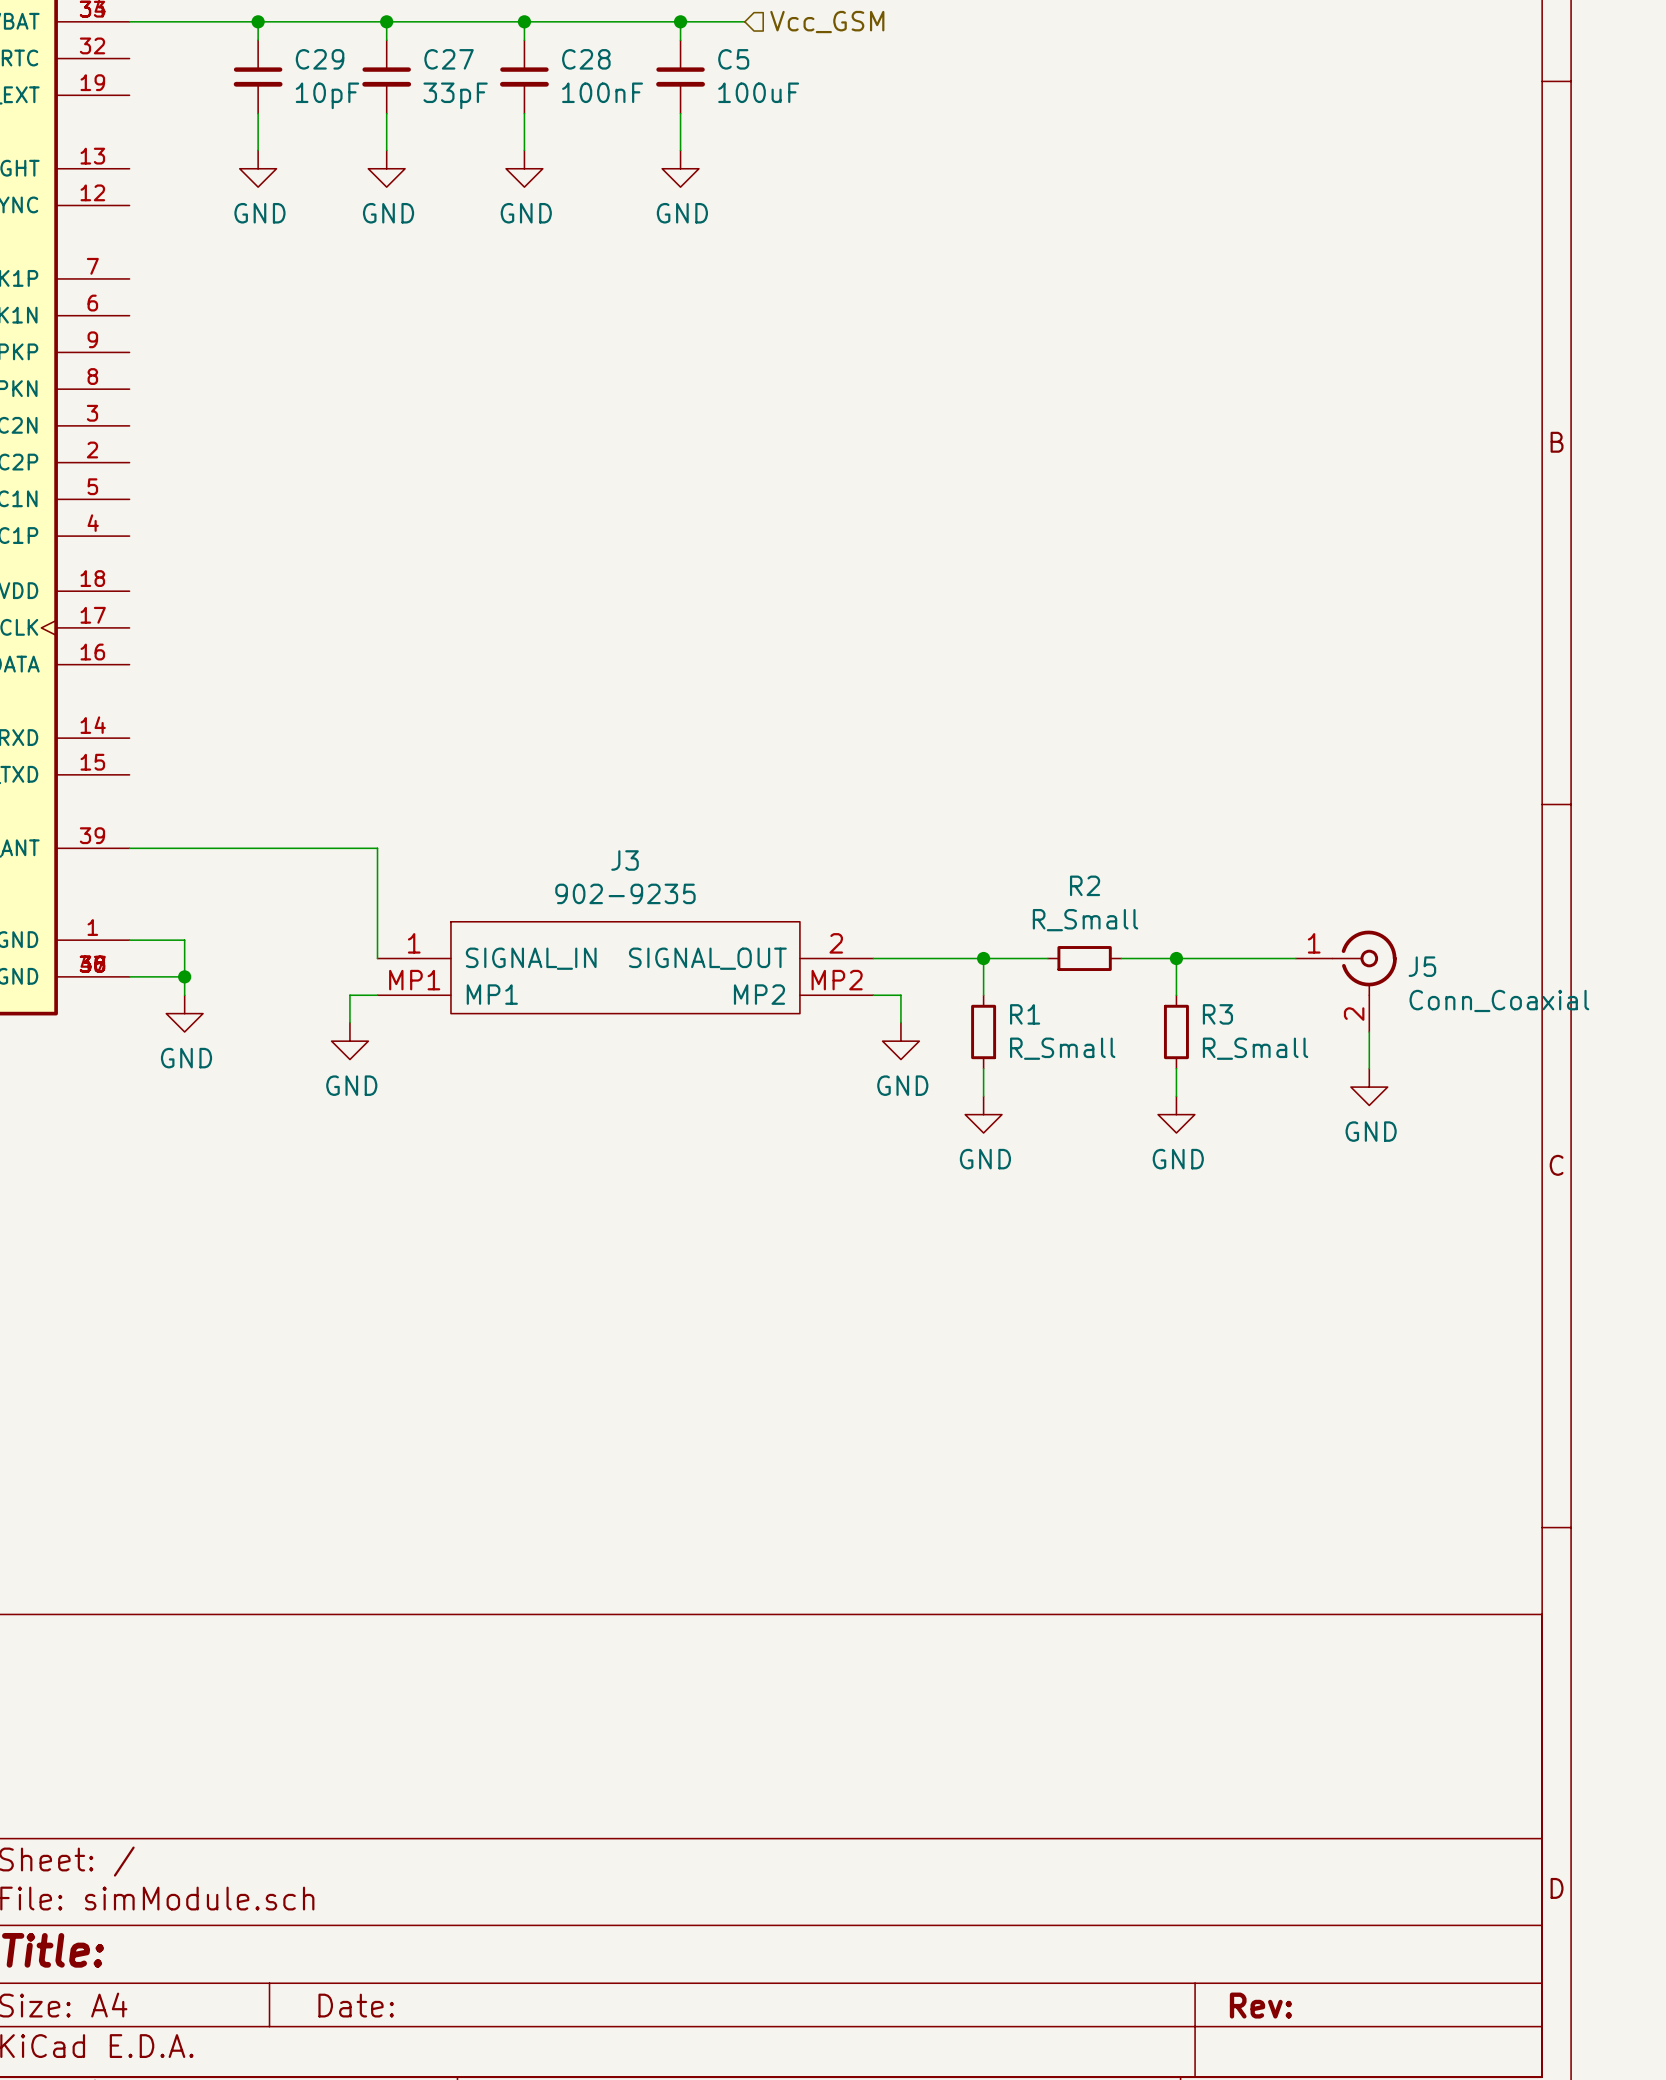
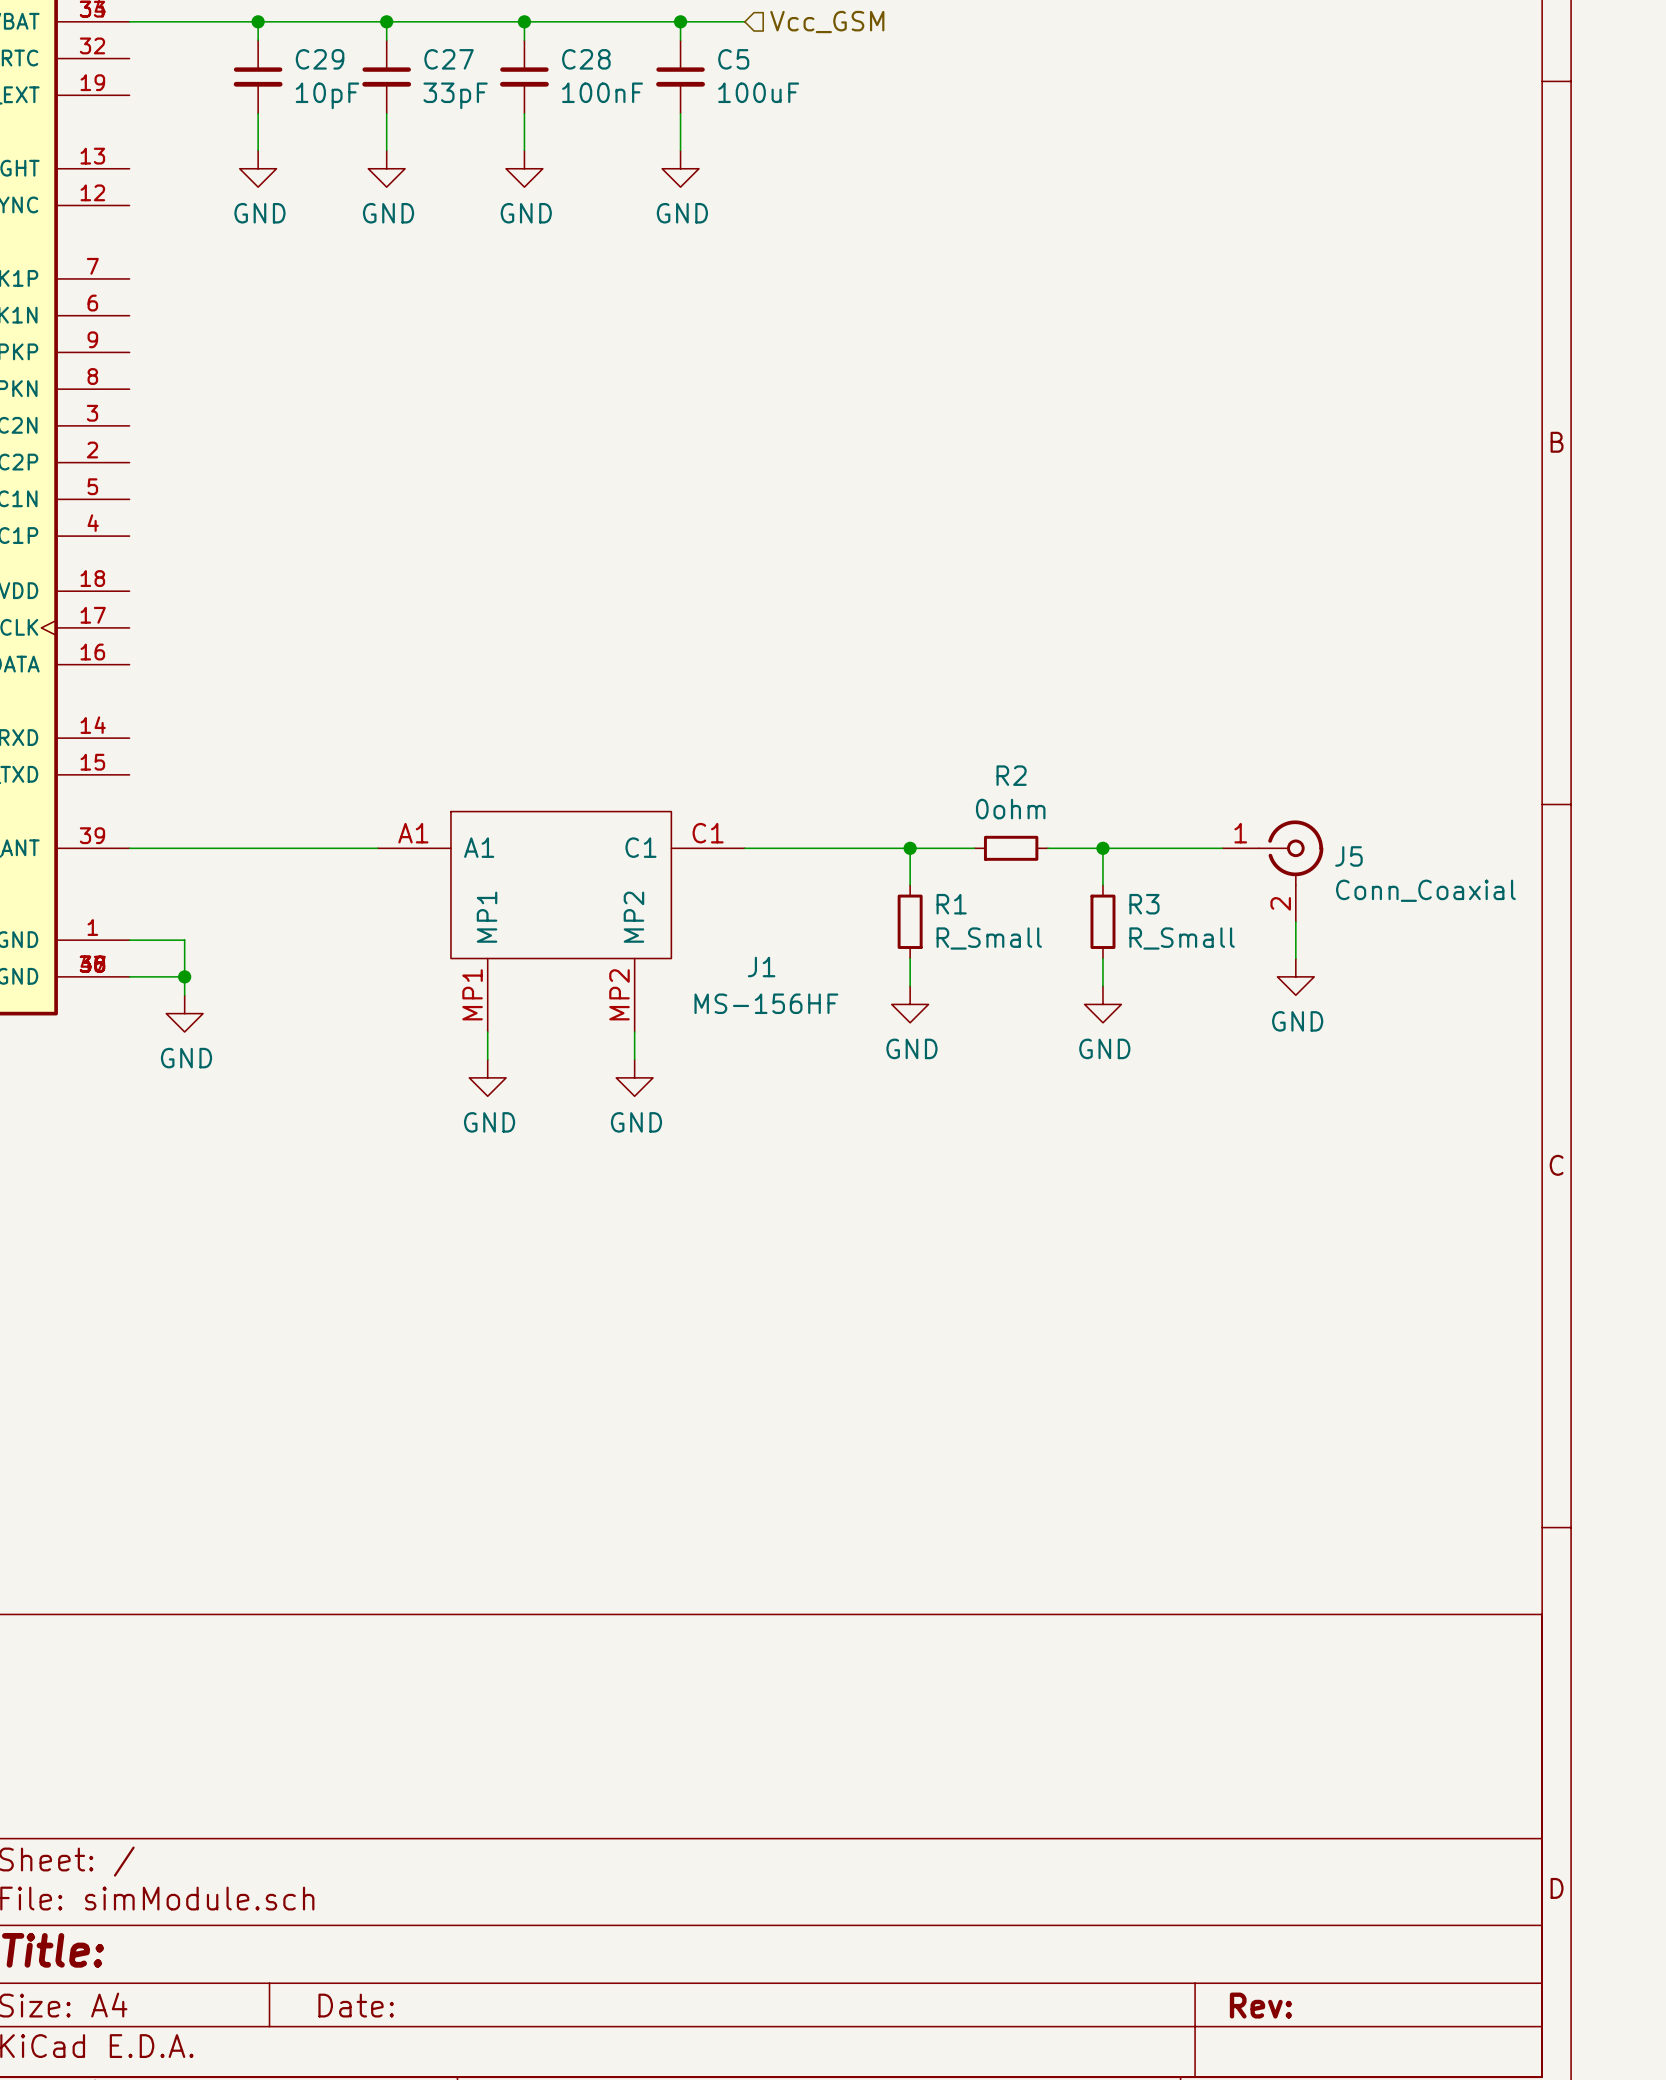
wire: (377, 848) (377, 958) -> none
wire: none -> (744, 848) (974, 848)
junction: none -> (910, 848)
junction: none -> (1102, 848)
R2 value: R_Small (1085, 920) -> 0ohm (1010, 809)
J1: none -> MS-156HF (561, 921)
wire: (873, 958) (1047, 958) -> (1047, 848) (1222, 848)
wire: (983, 958) (983, 995) -> (910, 848) (910, 885)
junction: (983, 958) -> none
R2 position: (1084, 958) -> (1011, 848)
wire: (1121, 958) (1295, 958) -> (1295, 921) (1295, 958)
wire: (1176, 958) (1176, 995) -> (1102, 848) (1102, 885)
junction: (1176, 958) -> none
J3: 902-9235 (625, 967) -> none
power symbol: none -> GND (1295, 976)
J5 position: (1346, 981) -> (1272, 871)
wire: (377, 995) (349, 995) (349, 1022) -> none
wire: (873, 995) (900, 995) (900, 1022) -> none
power symbol: none -> GND (1102, 1004)
wire: none -> (487, 1031) (487, 1059)
wire: none -> (634, 1031) (634, 1059)
R1 position: (983, 1031) -> (910, 921)
R3 position: (1176, 1031) -> (1102, 921)
wire: (1369, 1031) (1369, 1068) -> none
power symbol position: GND (349, 1041) -> GND (487, 1077)
power symbol position: GND (900, 1041) -> GND (910, 1004)
wire: (983, 1068) (983, 1096) -> (910, 958) (910, 986)
wire: (1176, 1068) (1176, 1096) -> (1102, 958) (1102, 986)
power symbol: none -> GND (634, 1077)
power symbol: GND (1369, 1087) -> none
power symbol: GND (983, 1114) -> none
power symbol: GND (1176, 1114) -> none

